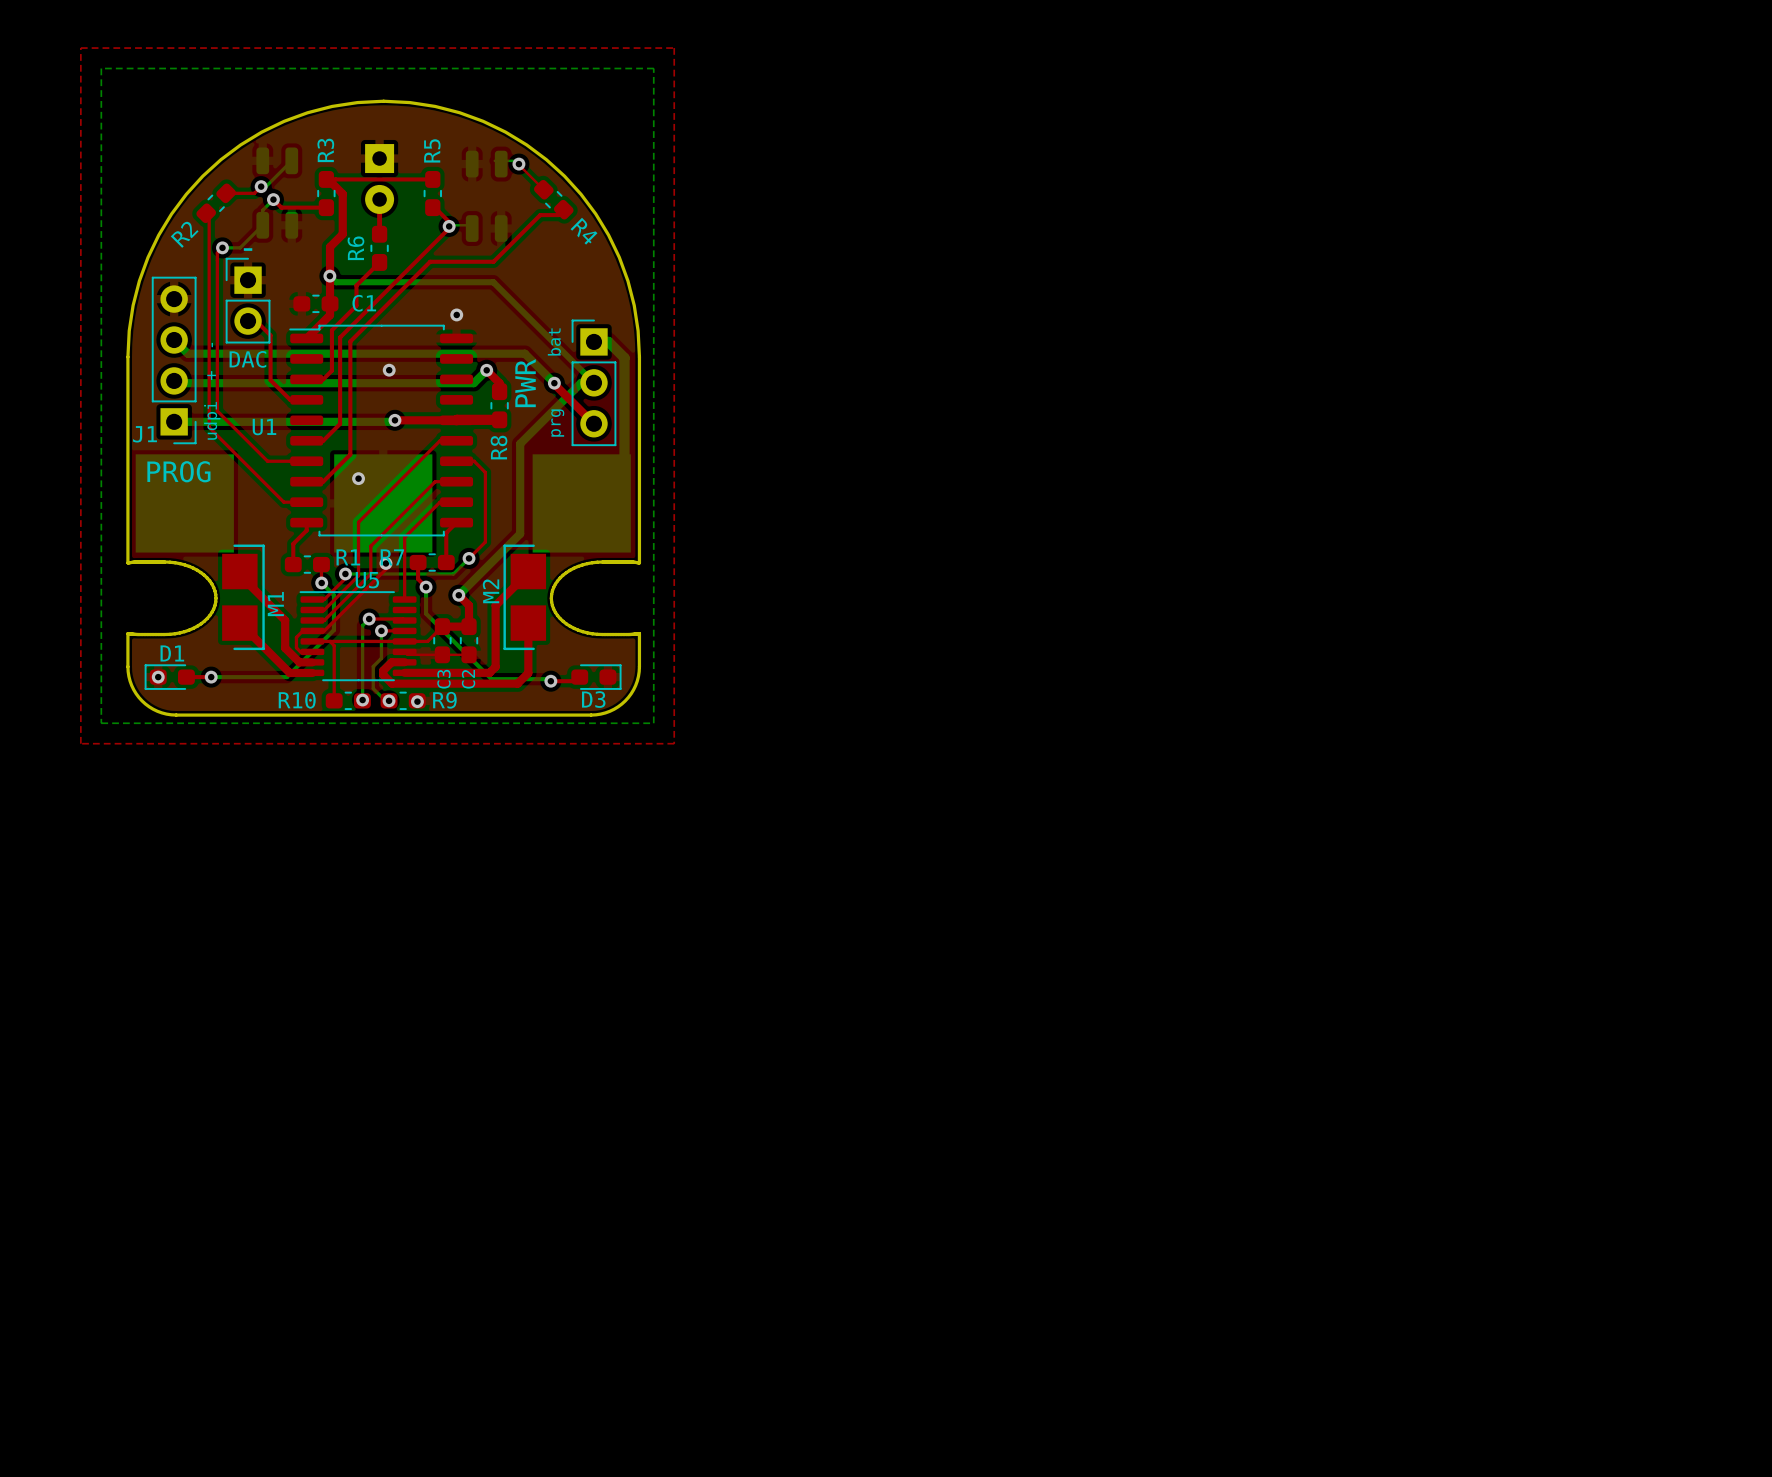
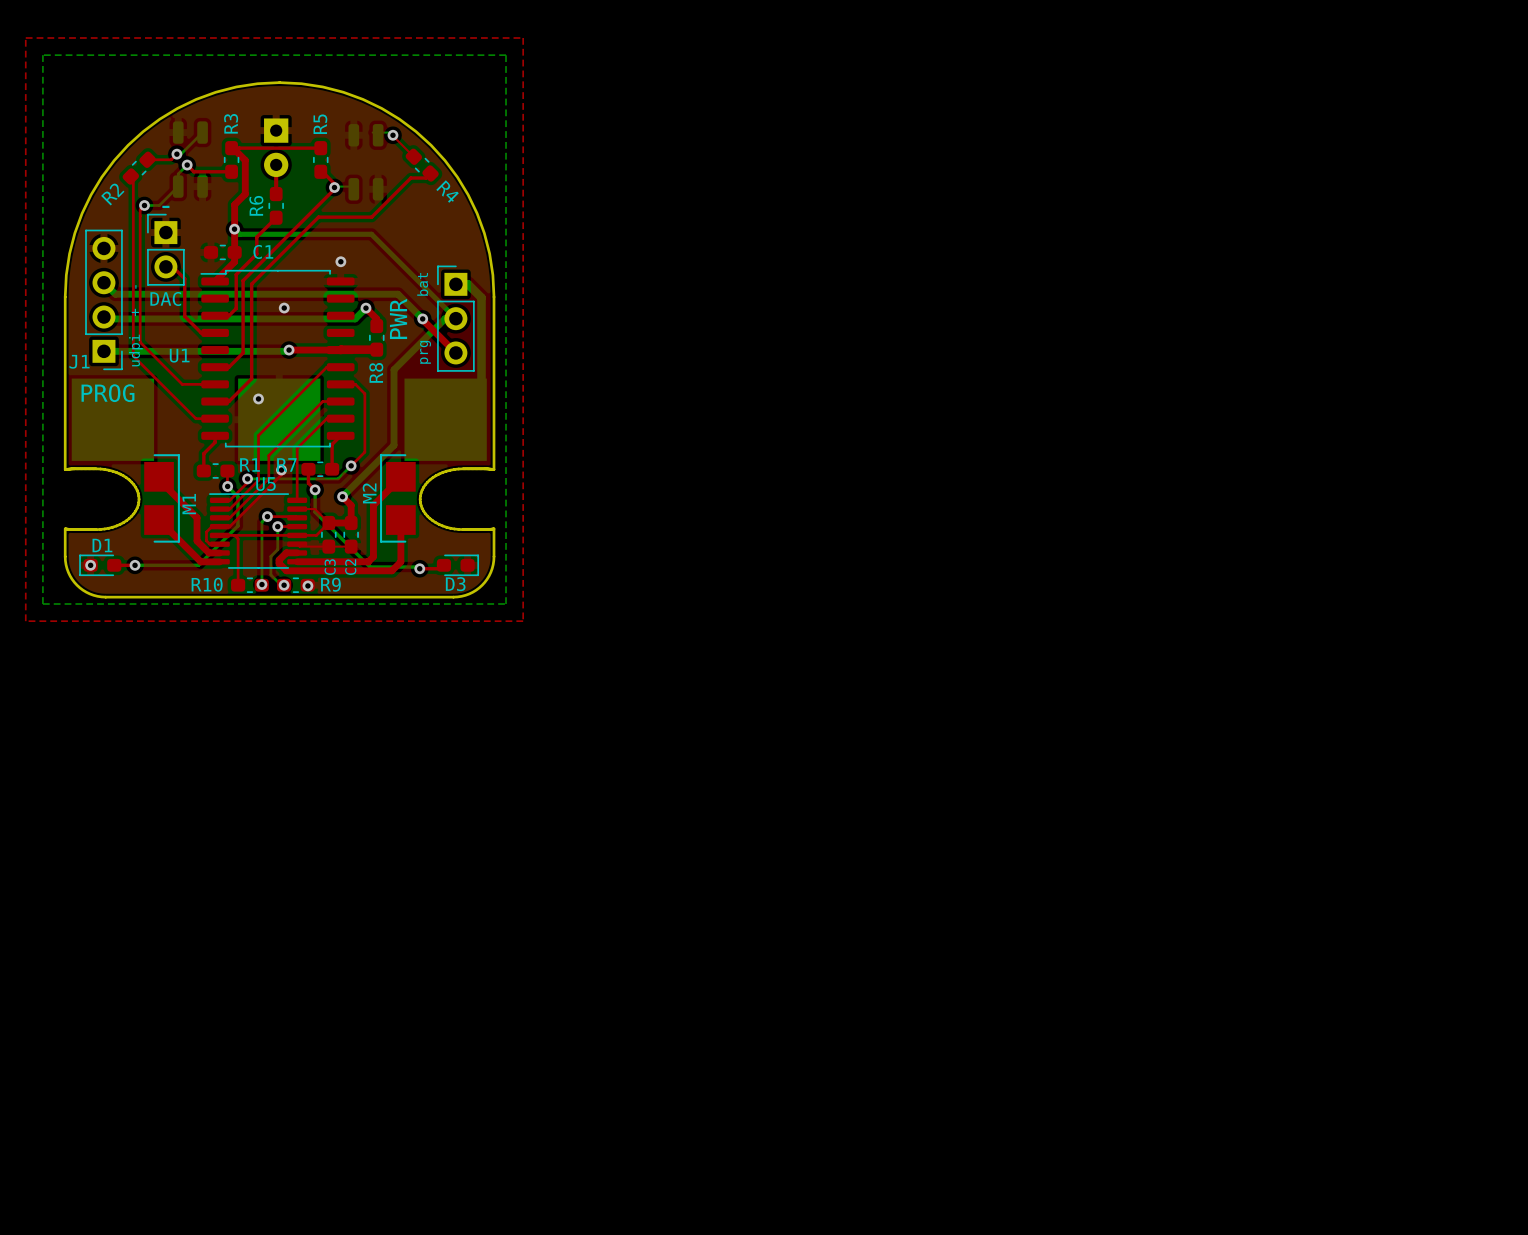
top track: none -> (297, 509) (314, 509) (328, 523)

